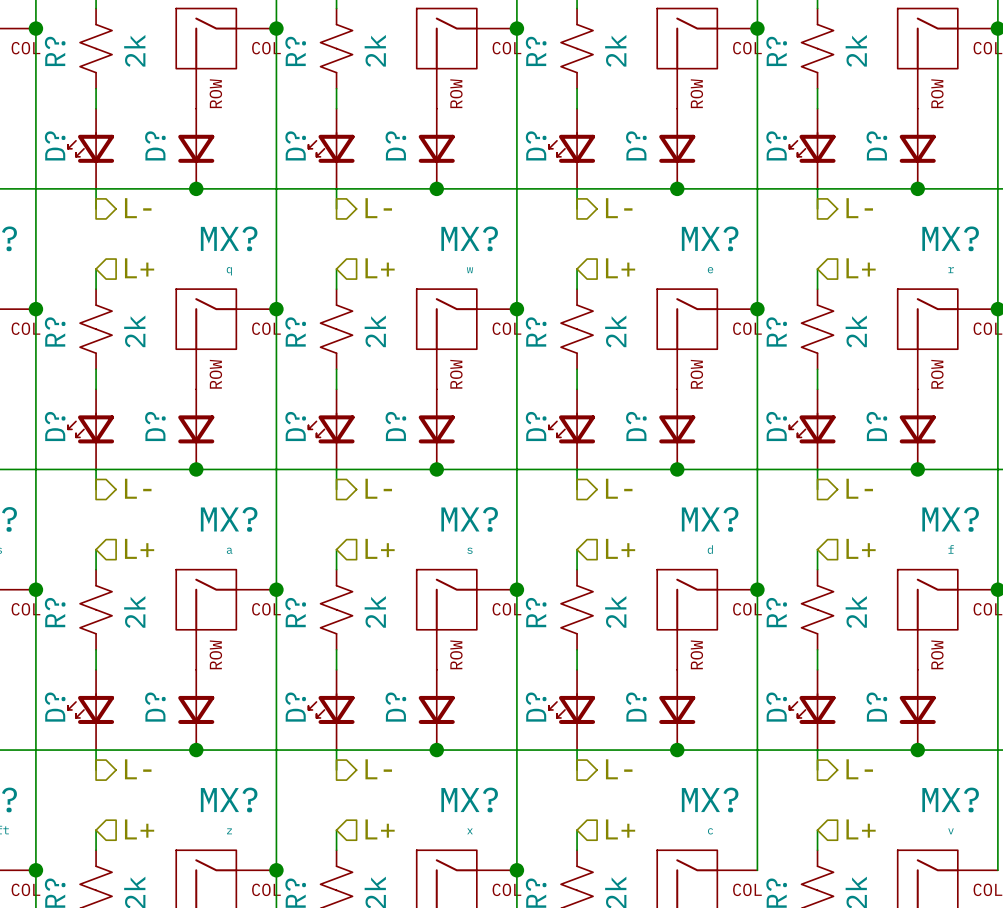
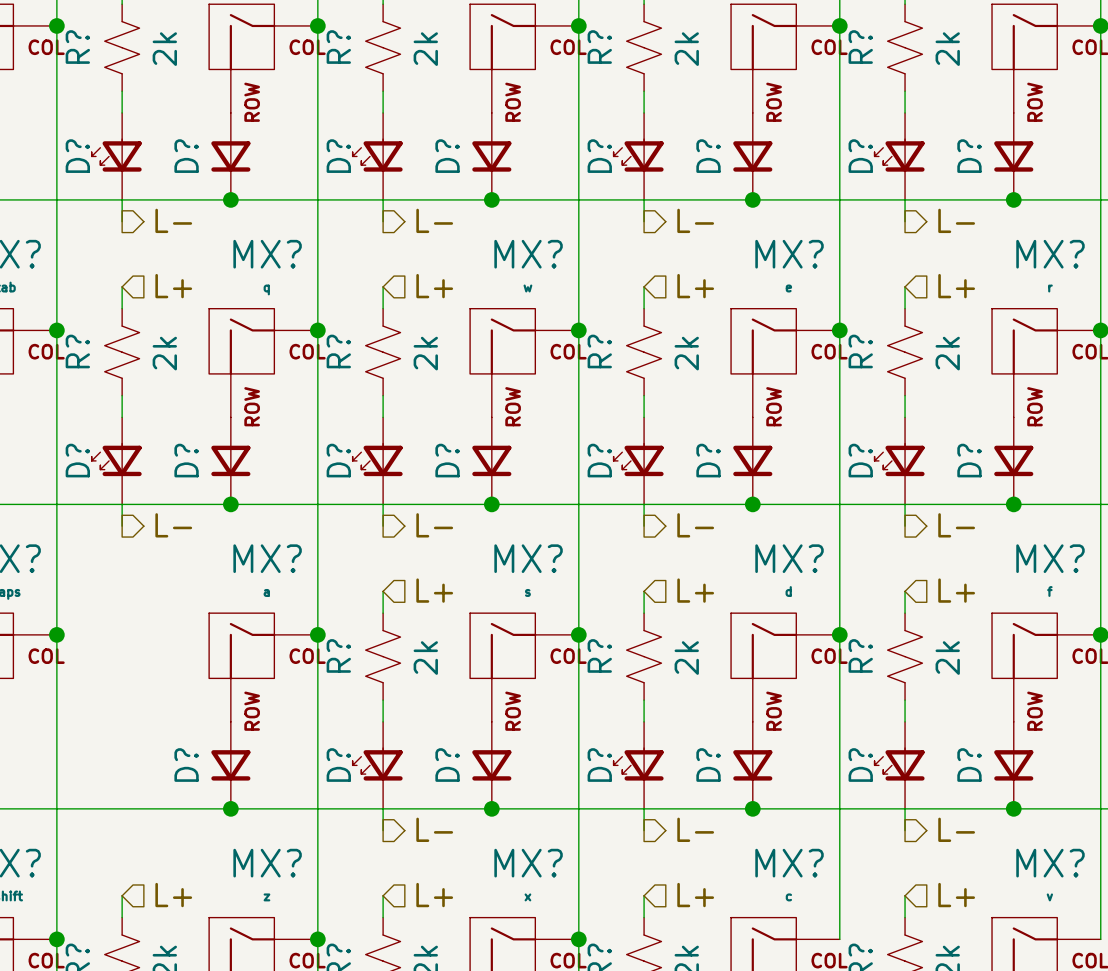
hierarchical label: L+ (139, 548) -> none
wire: (96, 549) (96, 569) -> none
R?: 2k (96, 609) -> none
wire: (96, 649) (96, 669) -> none
D?: (91, 709) -> none
wire: (96, 750) (96, 770) -> none
hierarchical label: L- (138, 769) -> none

